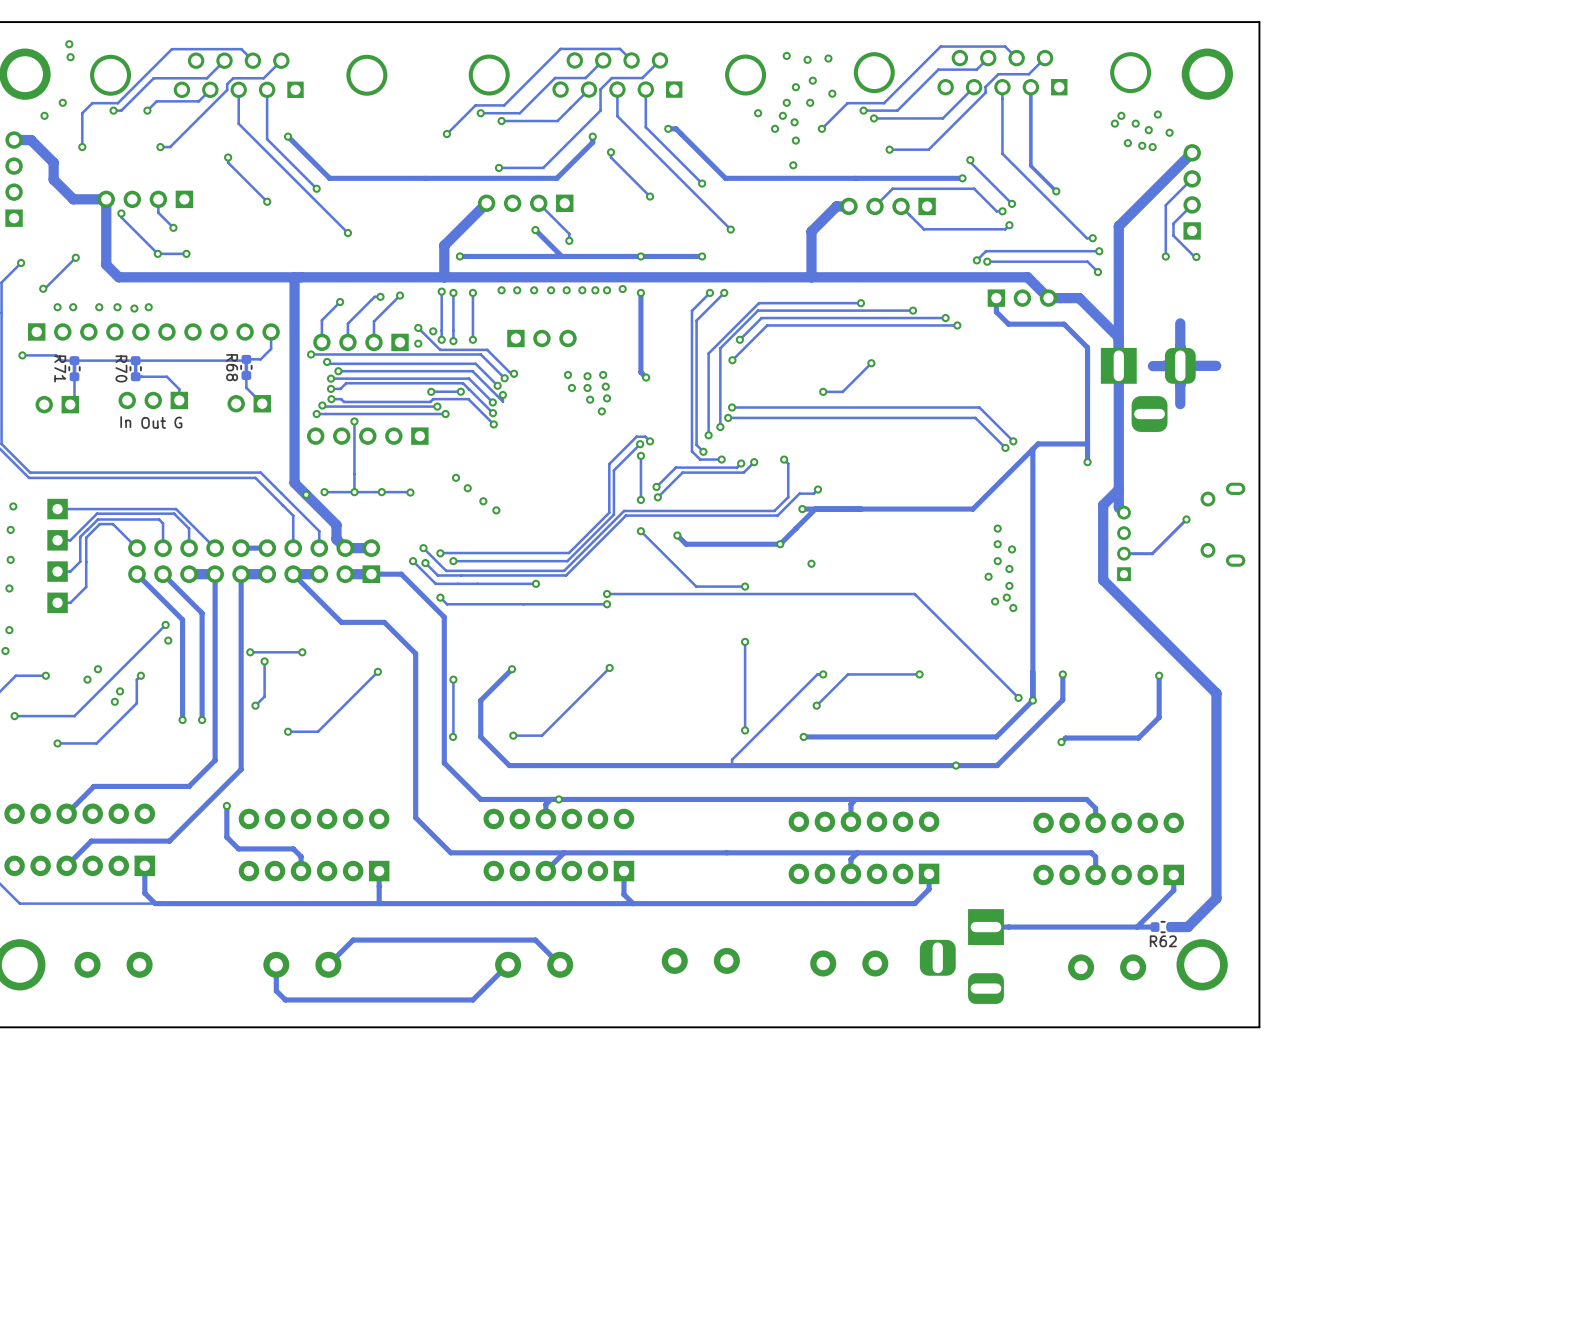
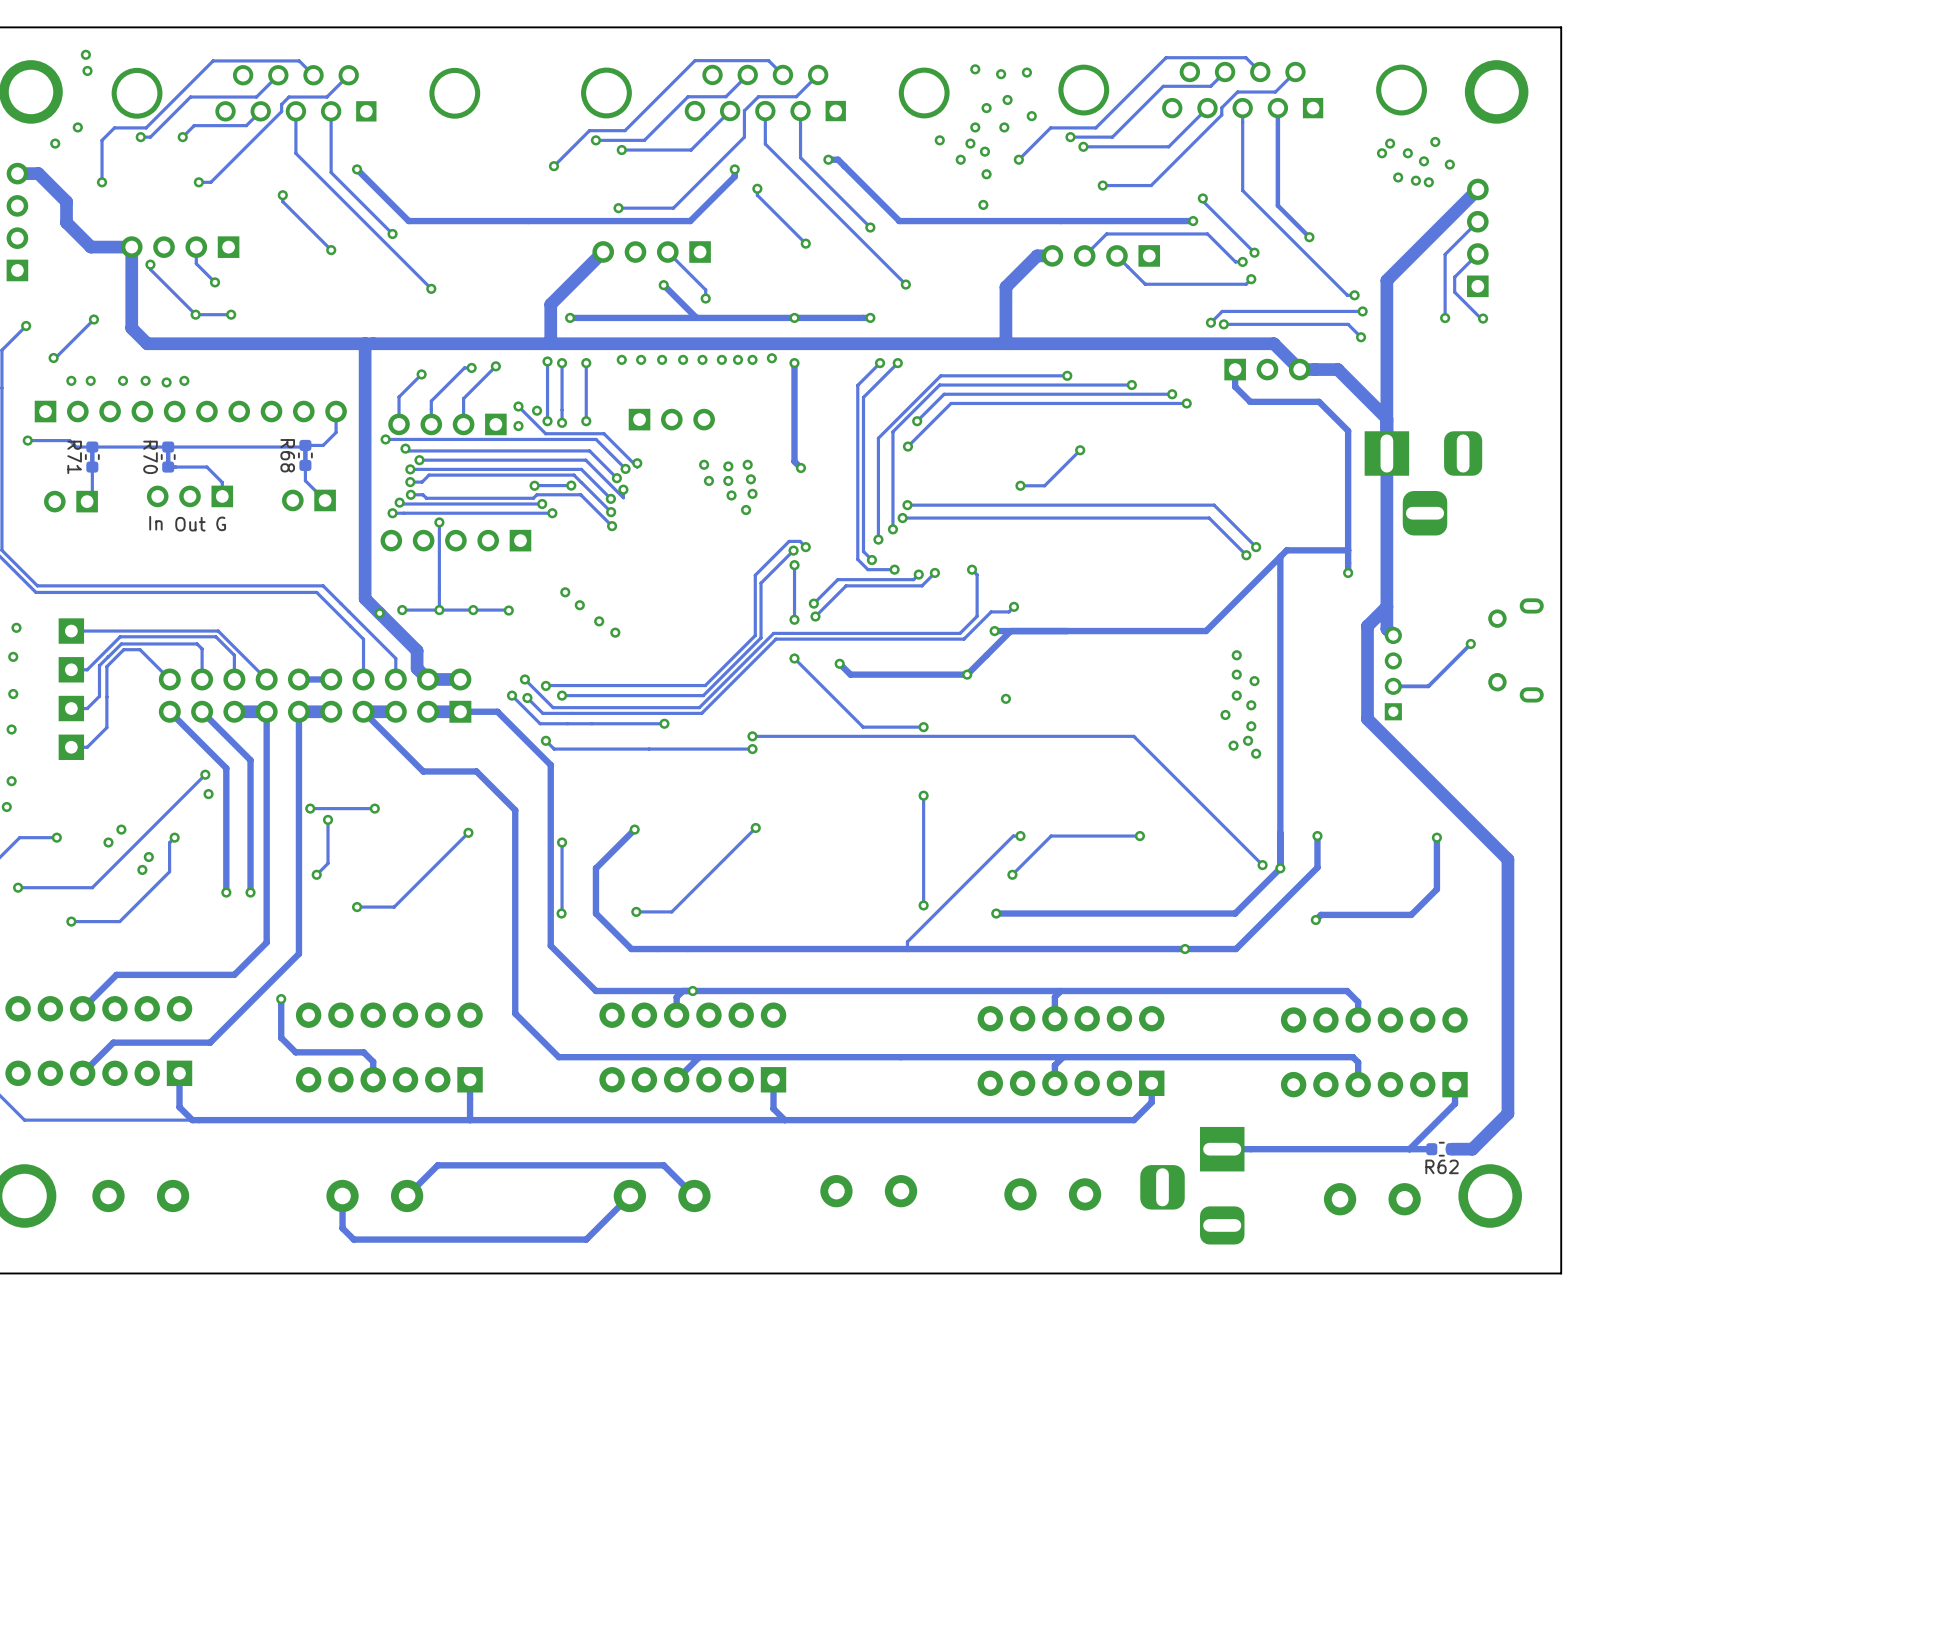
track: (1180, 323) (1180, 404) -> none
track: (1216, 365) (1152, 366) -> none

